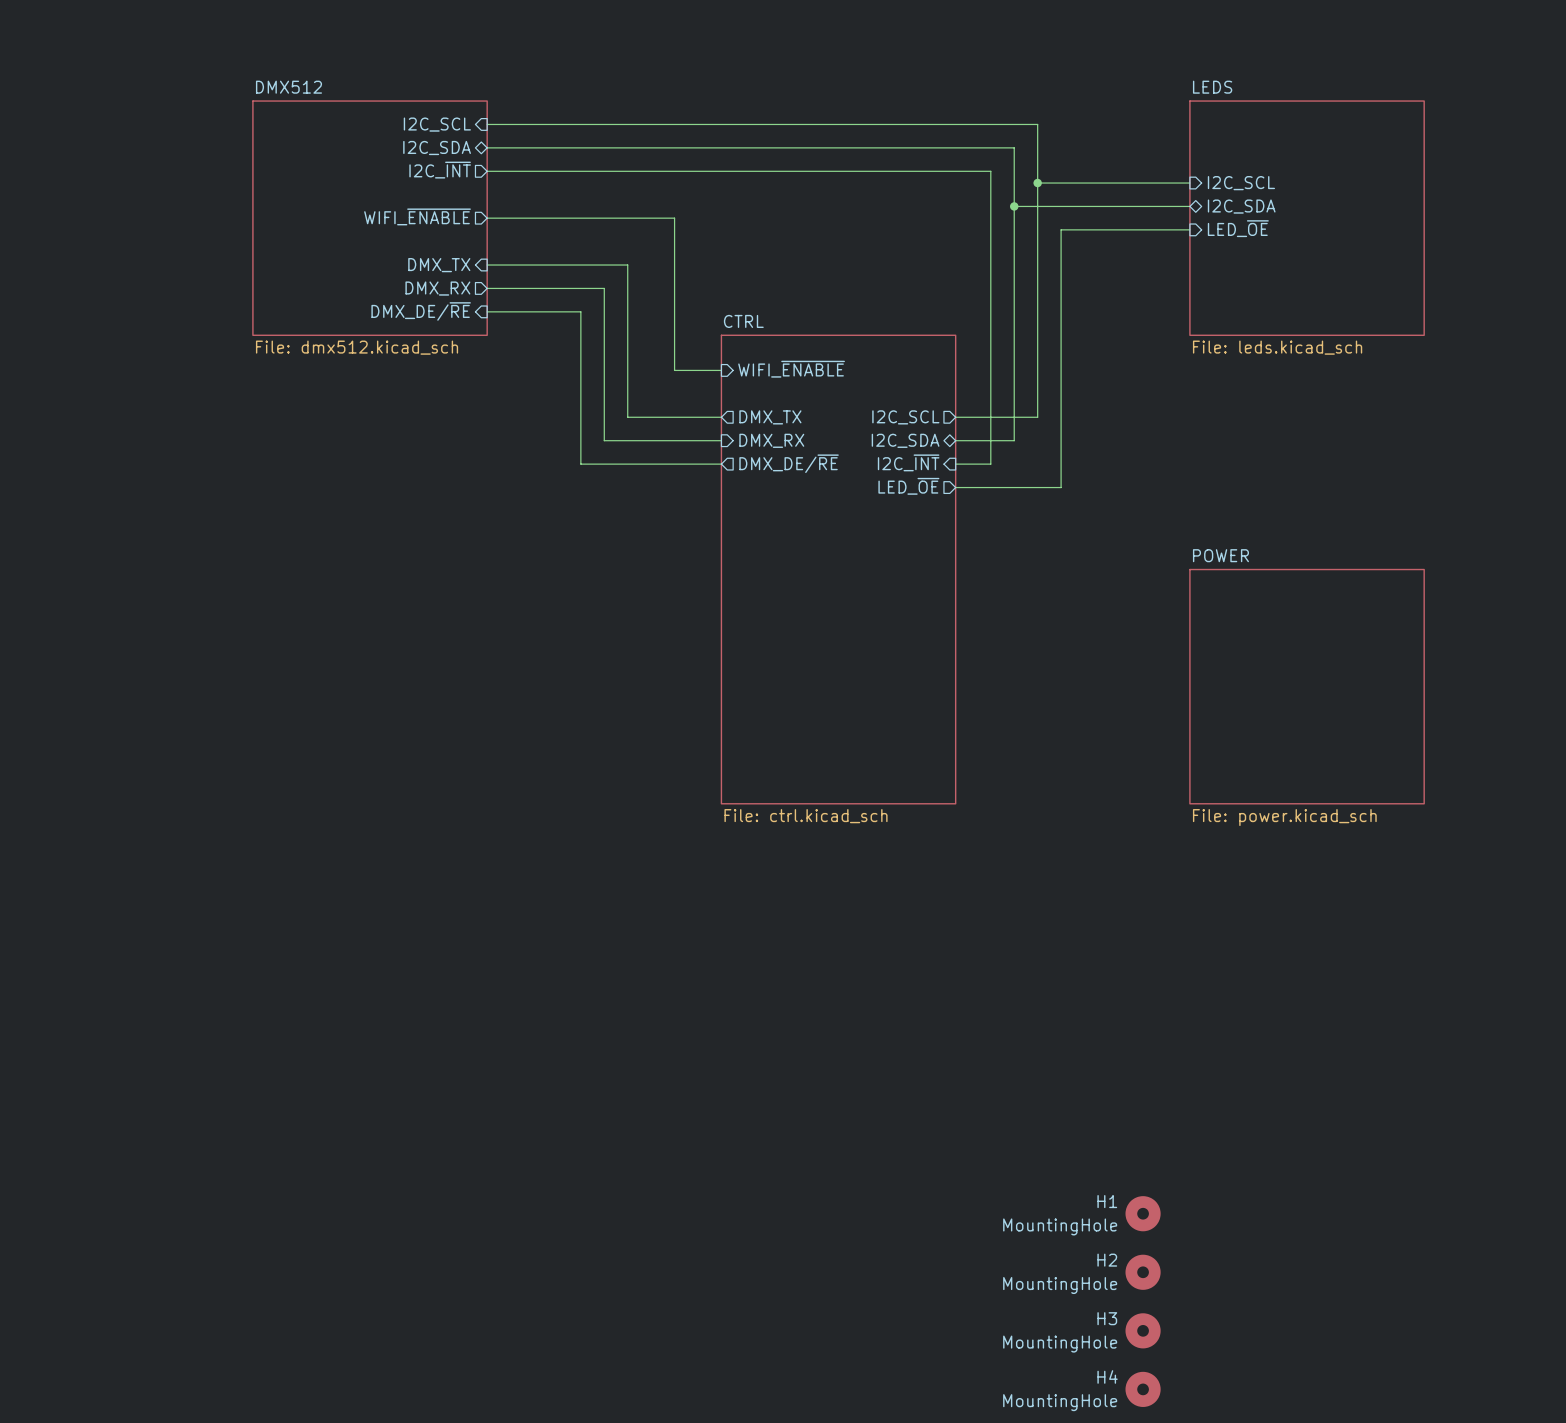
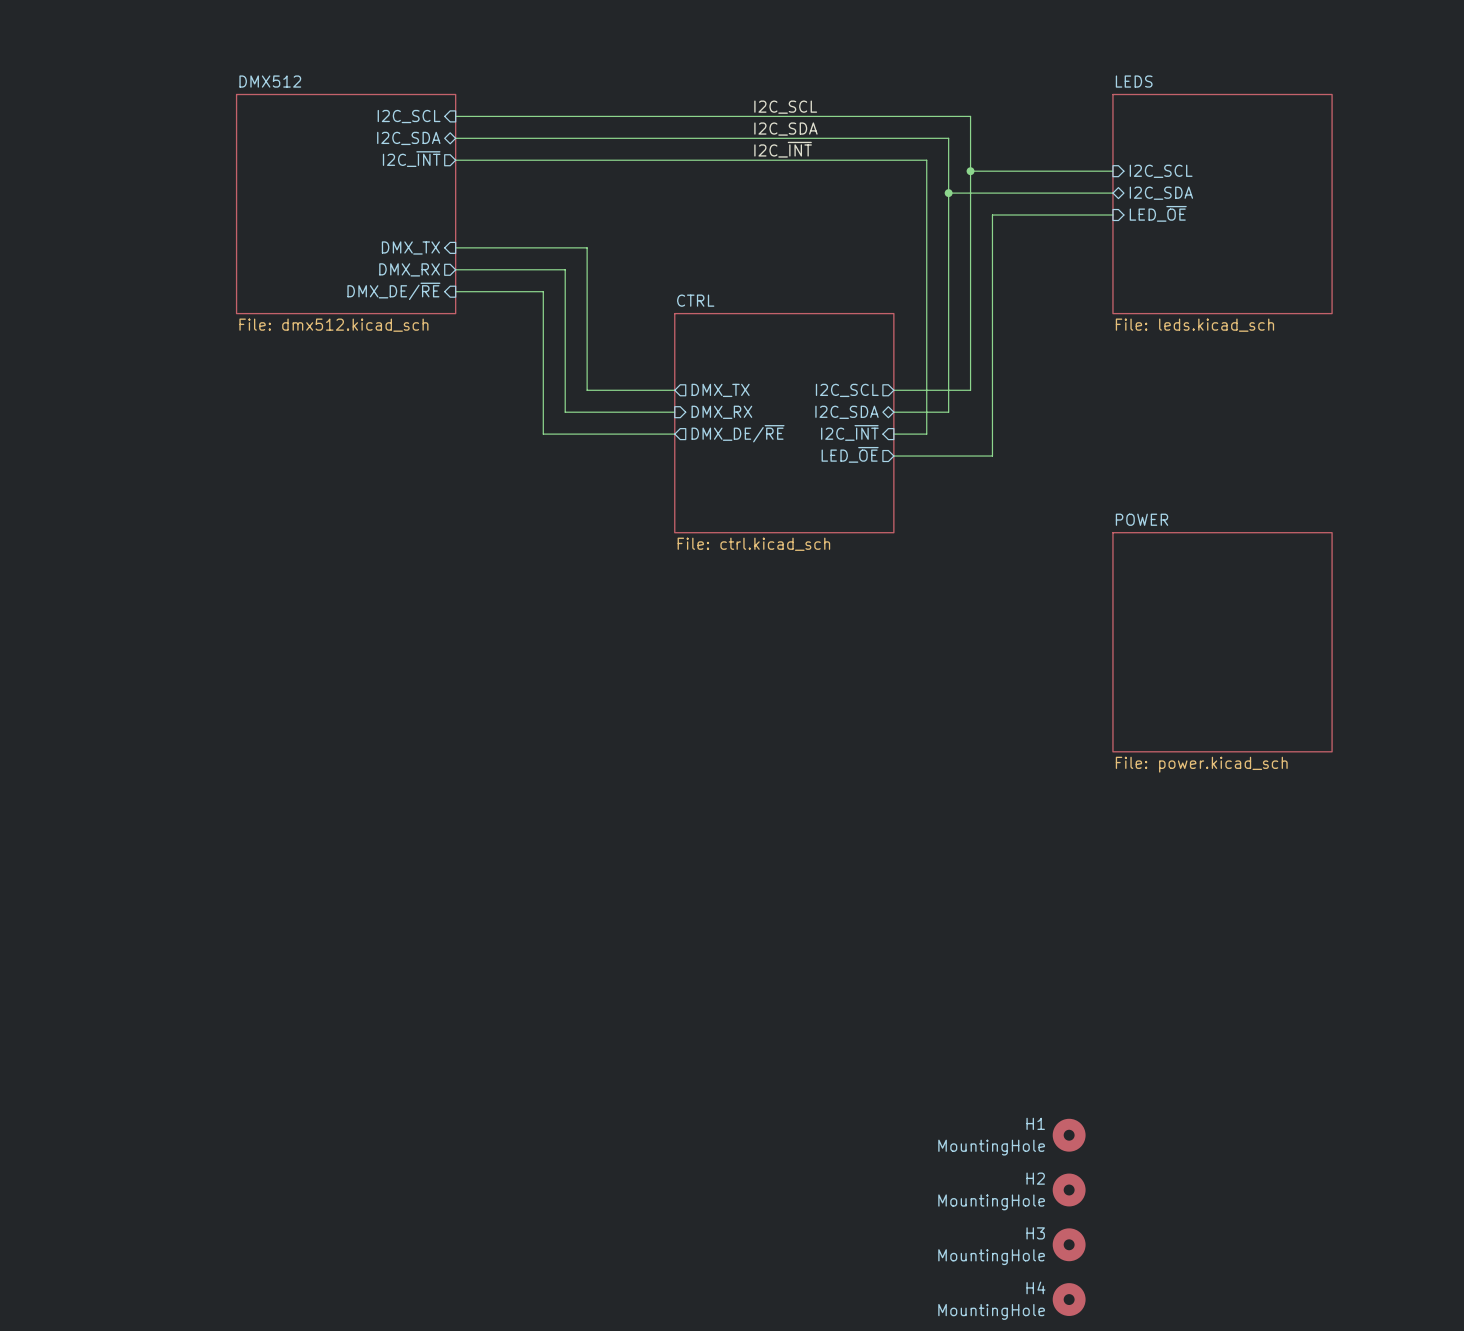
label: none -> I2C_SCL (785, 107)
label: none -> I2C_SDA (785, 129)
label: none -> I2C_~{INT} (783, 149)
sheet pin: WIFI_~{ENABLE} (417, 216) -> none
wire: (487, 218) (674, 218) (674, 370) (721, 370) -> none
sheet pin: WIFI_~{ENABLE} (791, 369) -> none
sheet CTRL: none -> File: ctrl.kicad_sch (784, 423)
sheet CTRL: File: ctrl.kicad_sch (838, 569) -> none

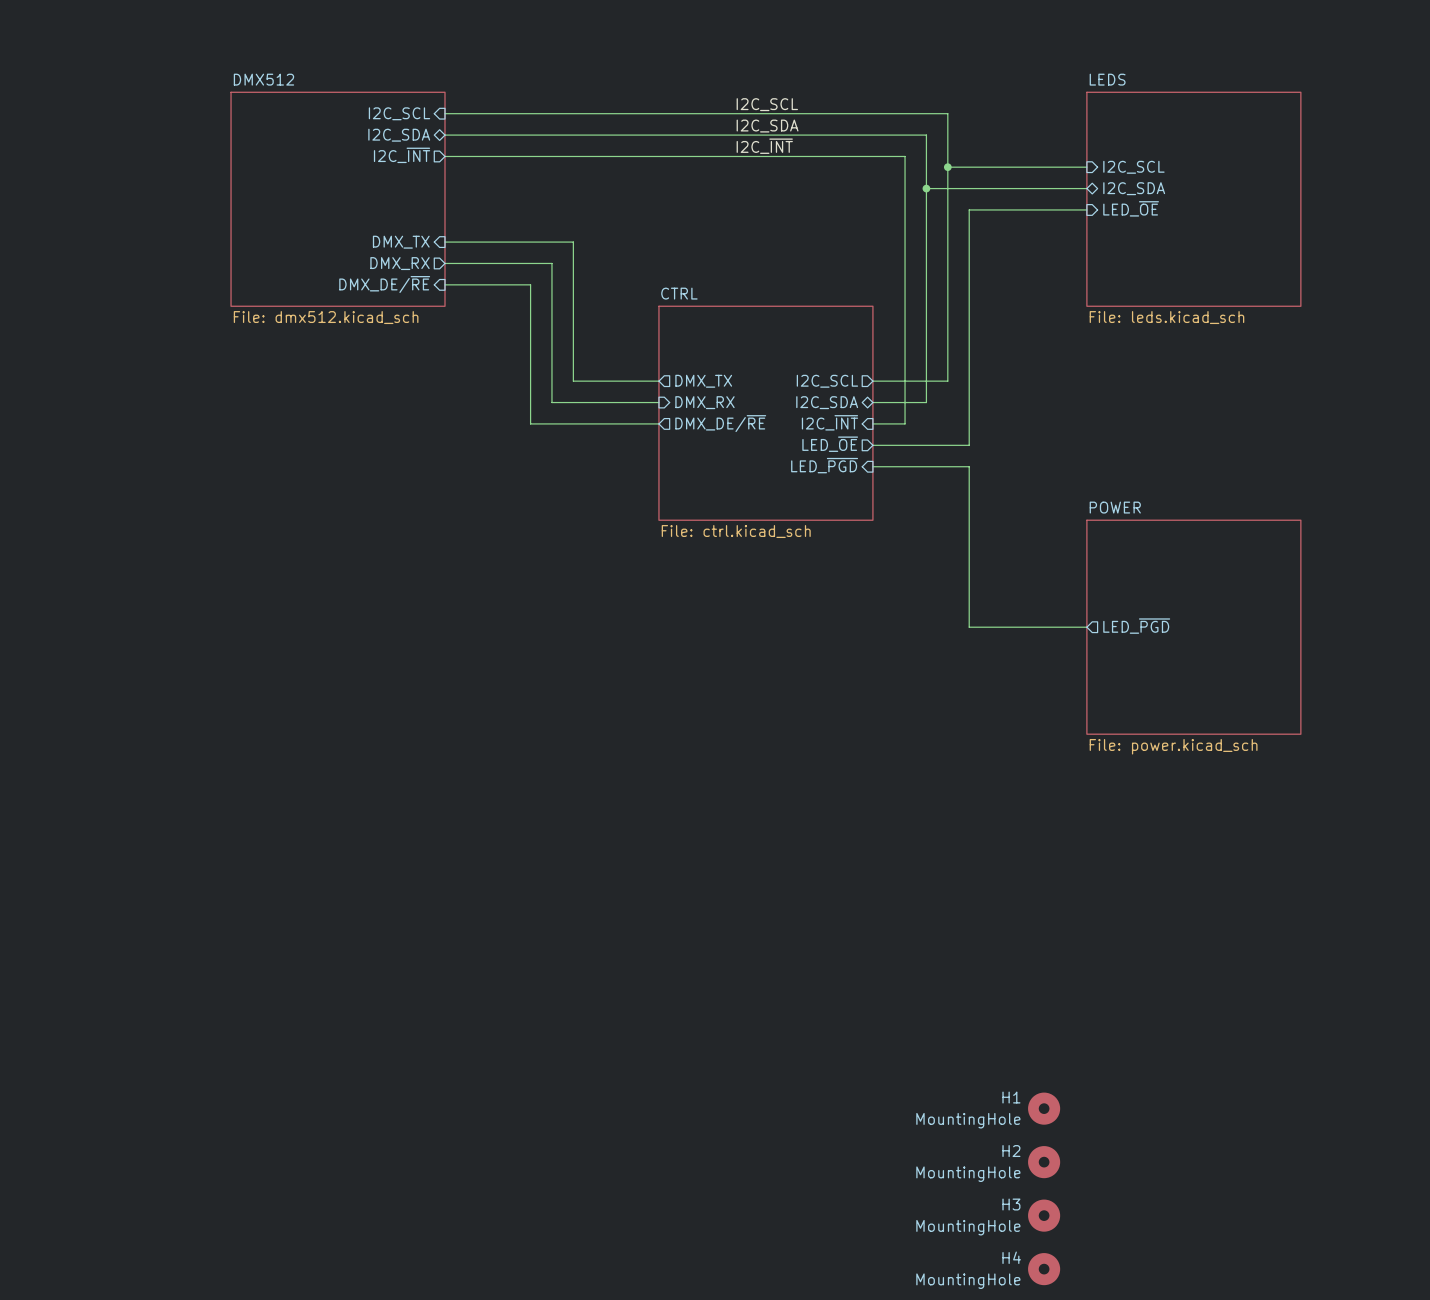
sheet pin: none -> LED_~{PGD} (824, 465)
wire: none -> (872, 466) (969, 466) (969, 627) (1086, 627)
sheet pin: none -> LED_~{PGD} (1136, 626)

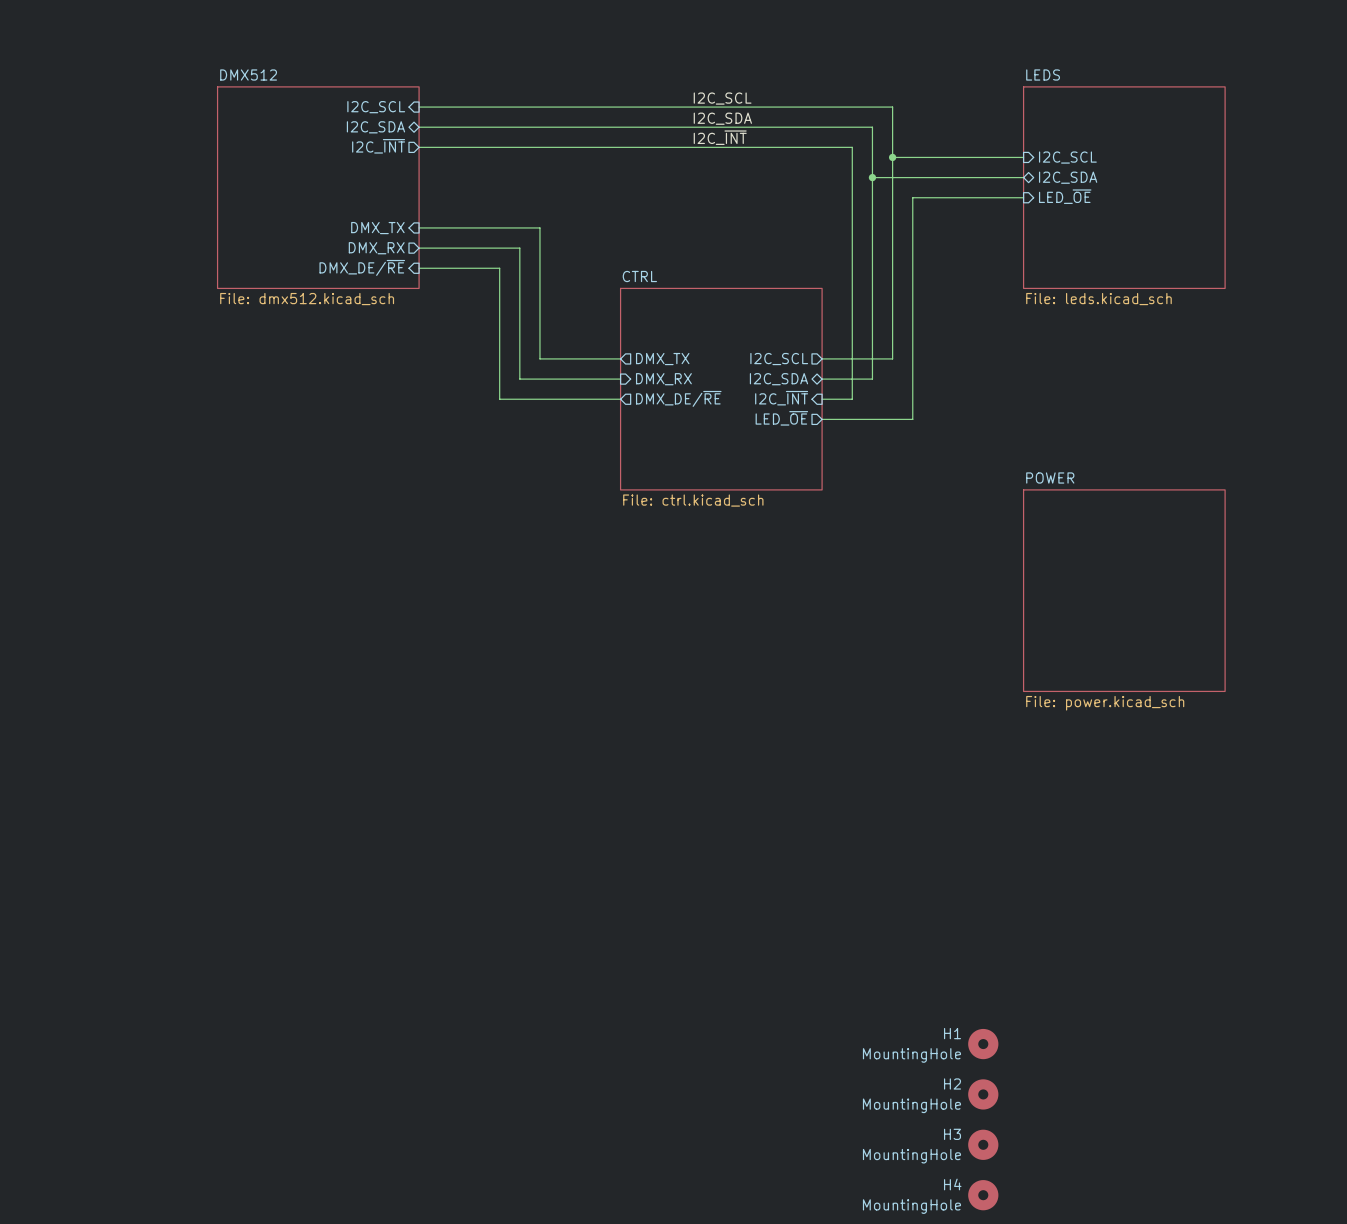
sheet pin: LED_~{PGD} (824, 465) -> none
wire: (872, 466) (969, 466) (969, 627) (1086, 627) -> none
sheet pin: LED_~{PGD} (1136, 626) -> none

